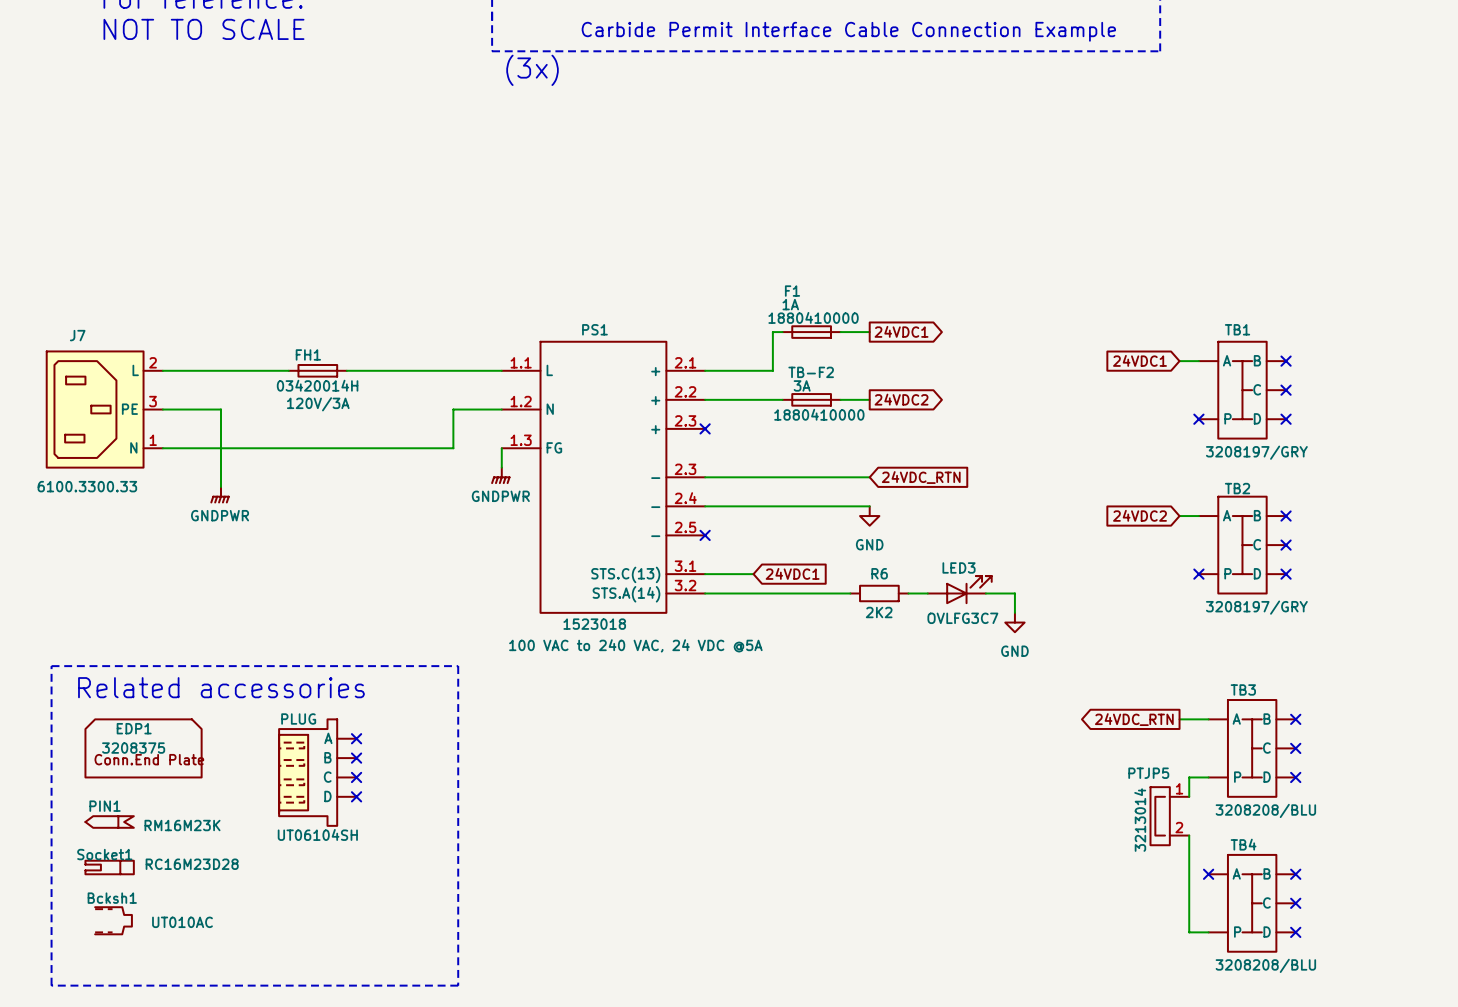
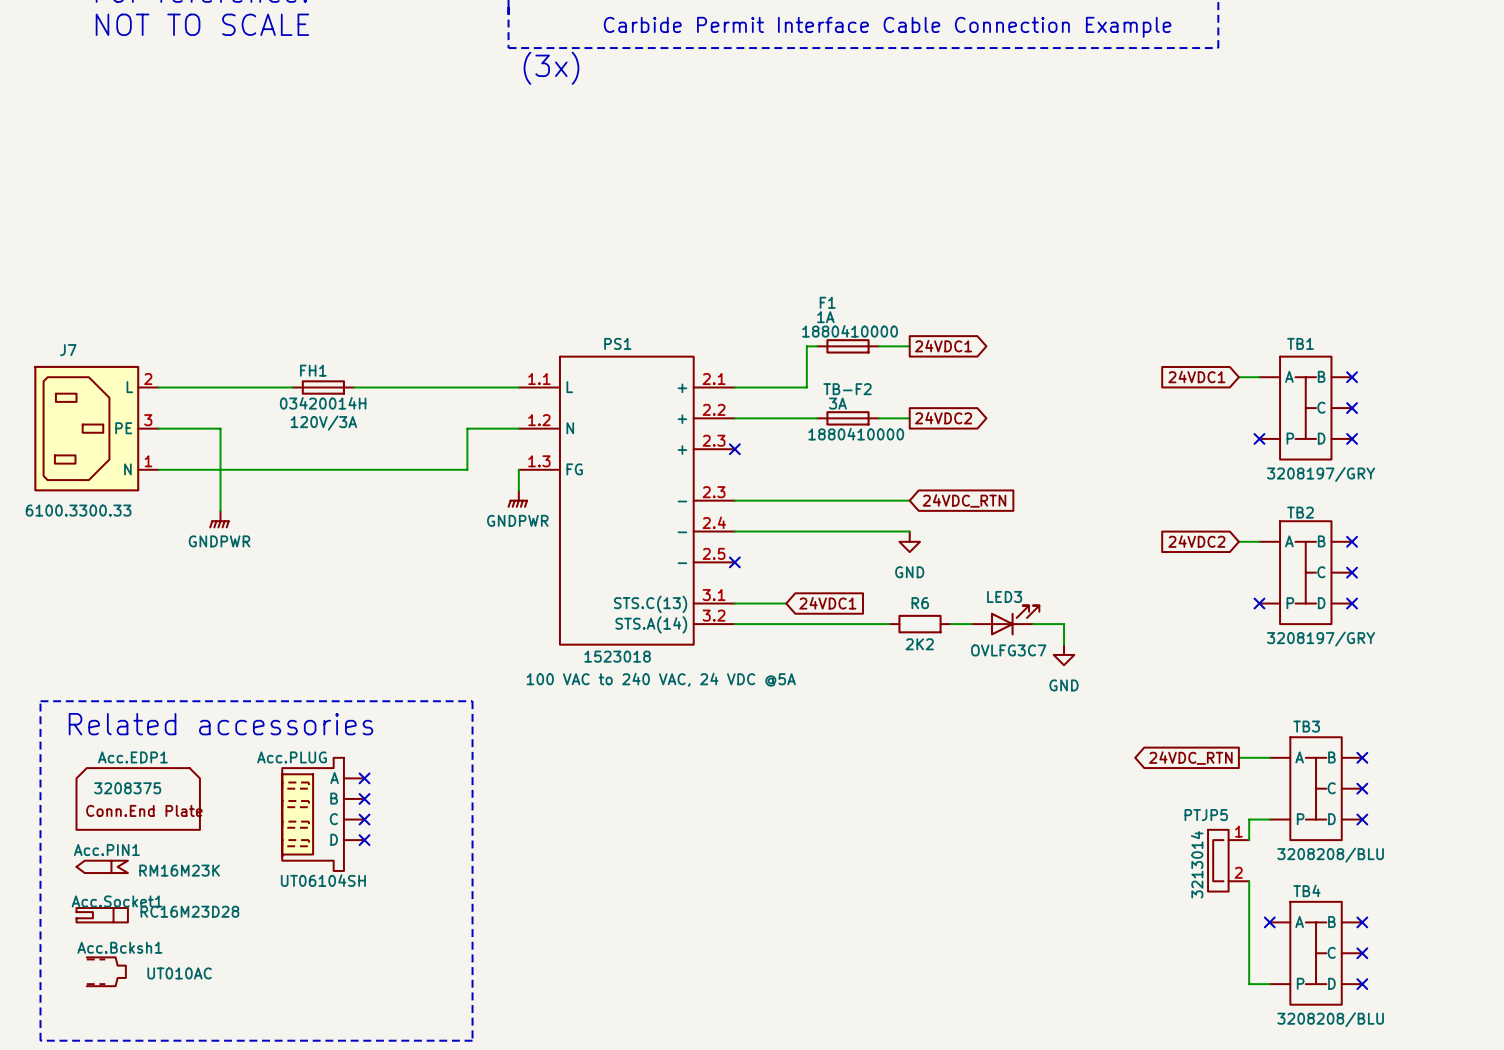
PLUG name: PLUG (298, 719) -> Acc.PLUG (292, 757)
EDP1: 3208375 (143, 748) -> none
Acc.EDP1: none -> 3208375 (138, 798)
PIN1 name: PIN1 (105, 806) -> Acc.PIN1 (106, 850)
Socket1 name: Socket1 (104, 854) -> Acc.Socket1 (117, 901)
Bcksh1 name: Bcksh1 (112, 898) -> Acc.Bcksh1 (119, 947)

